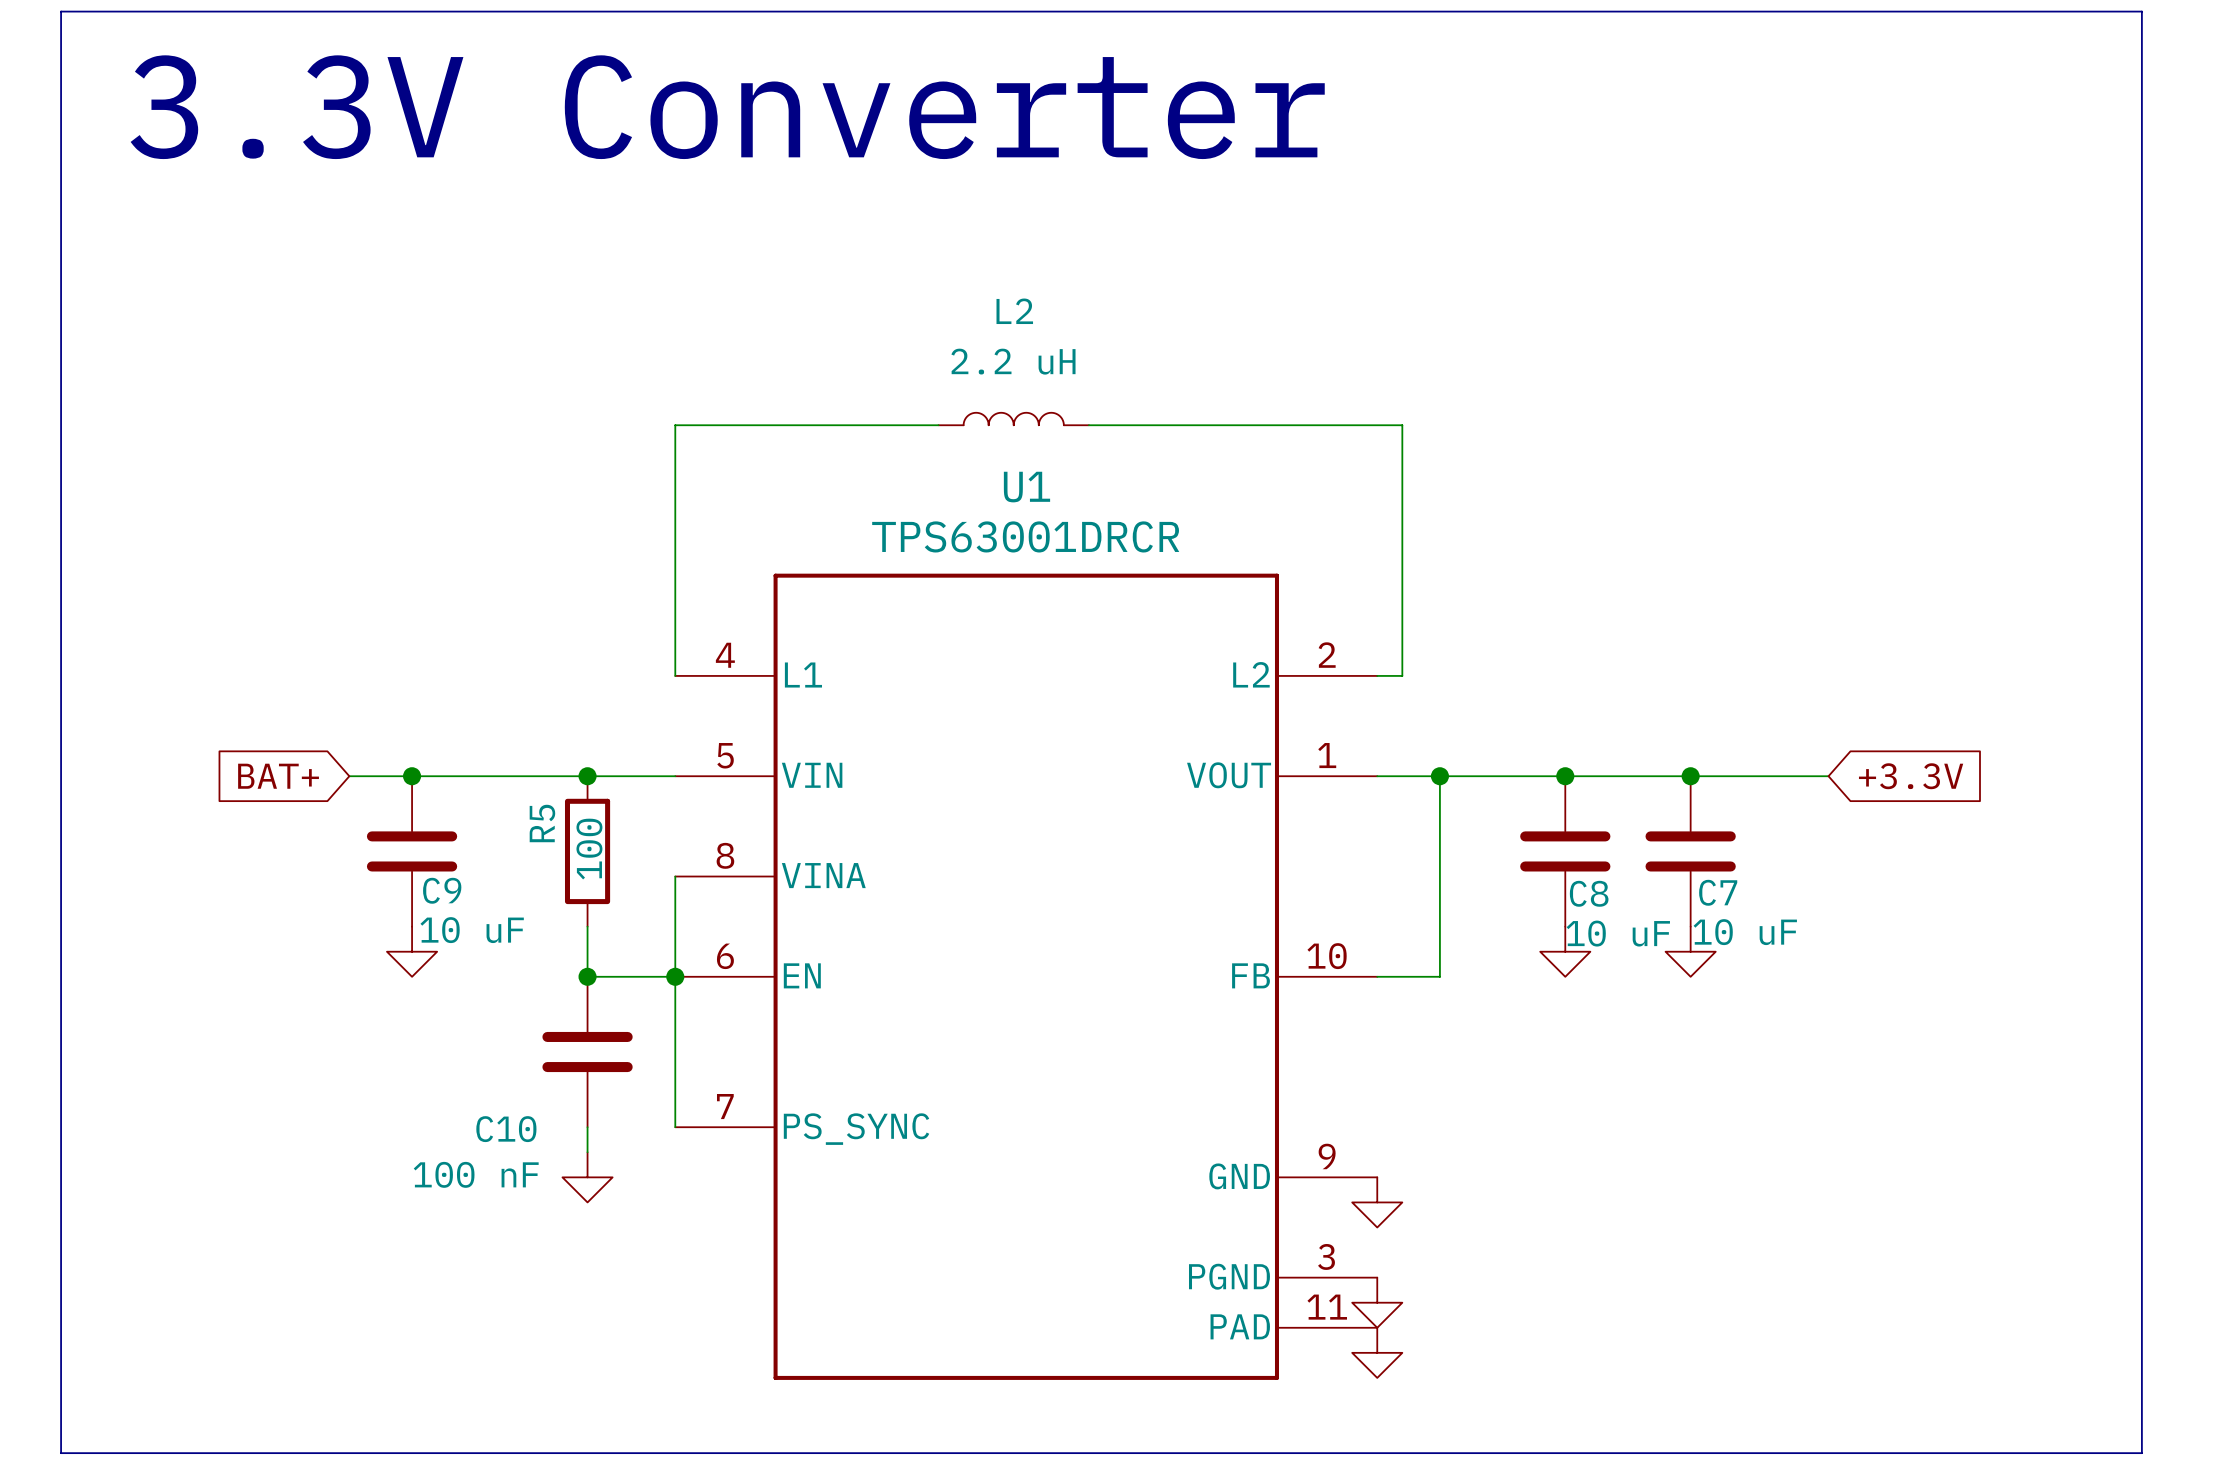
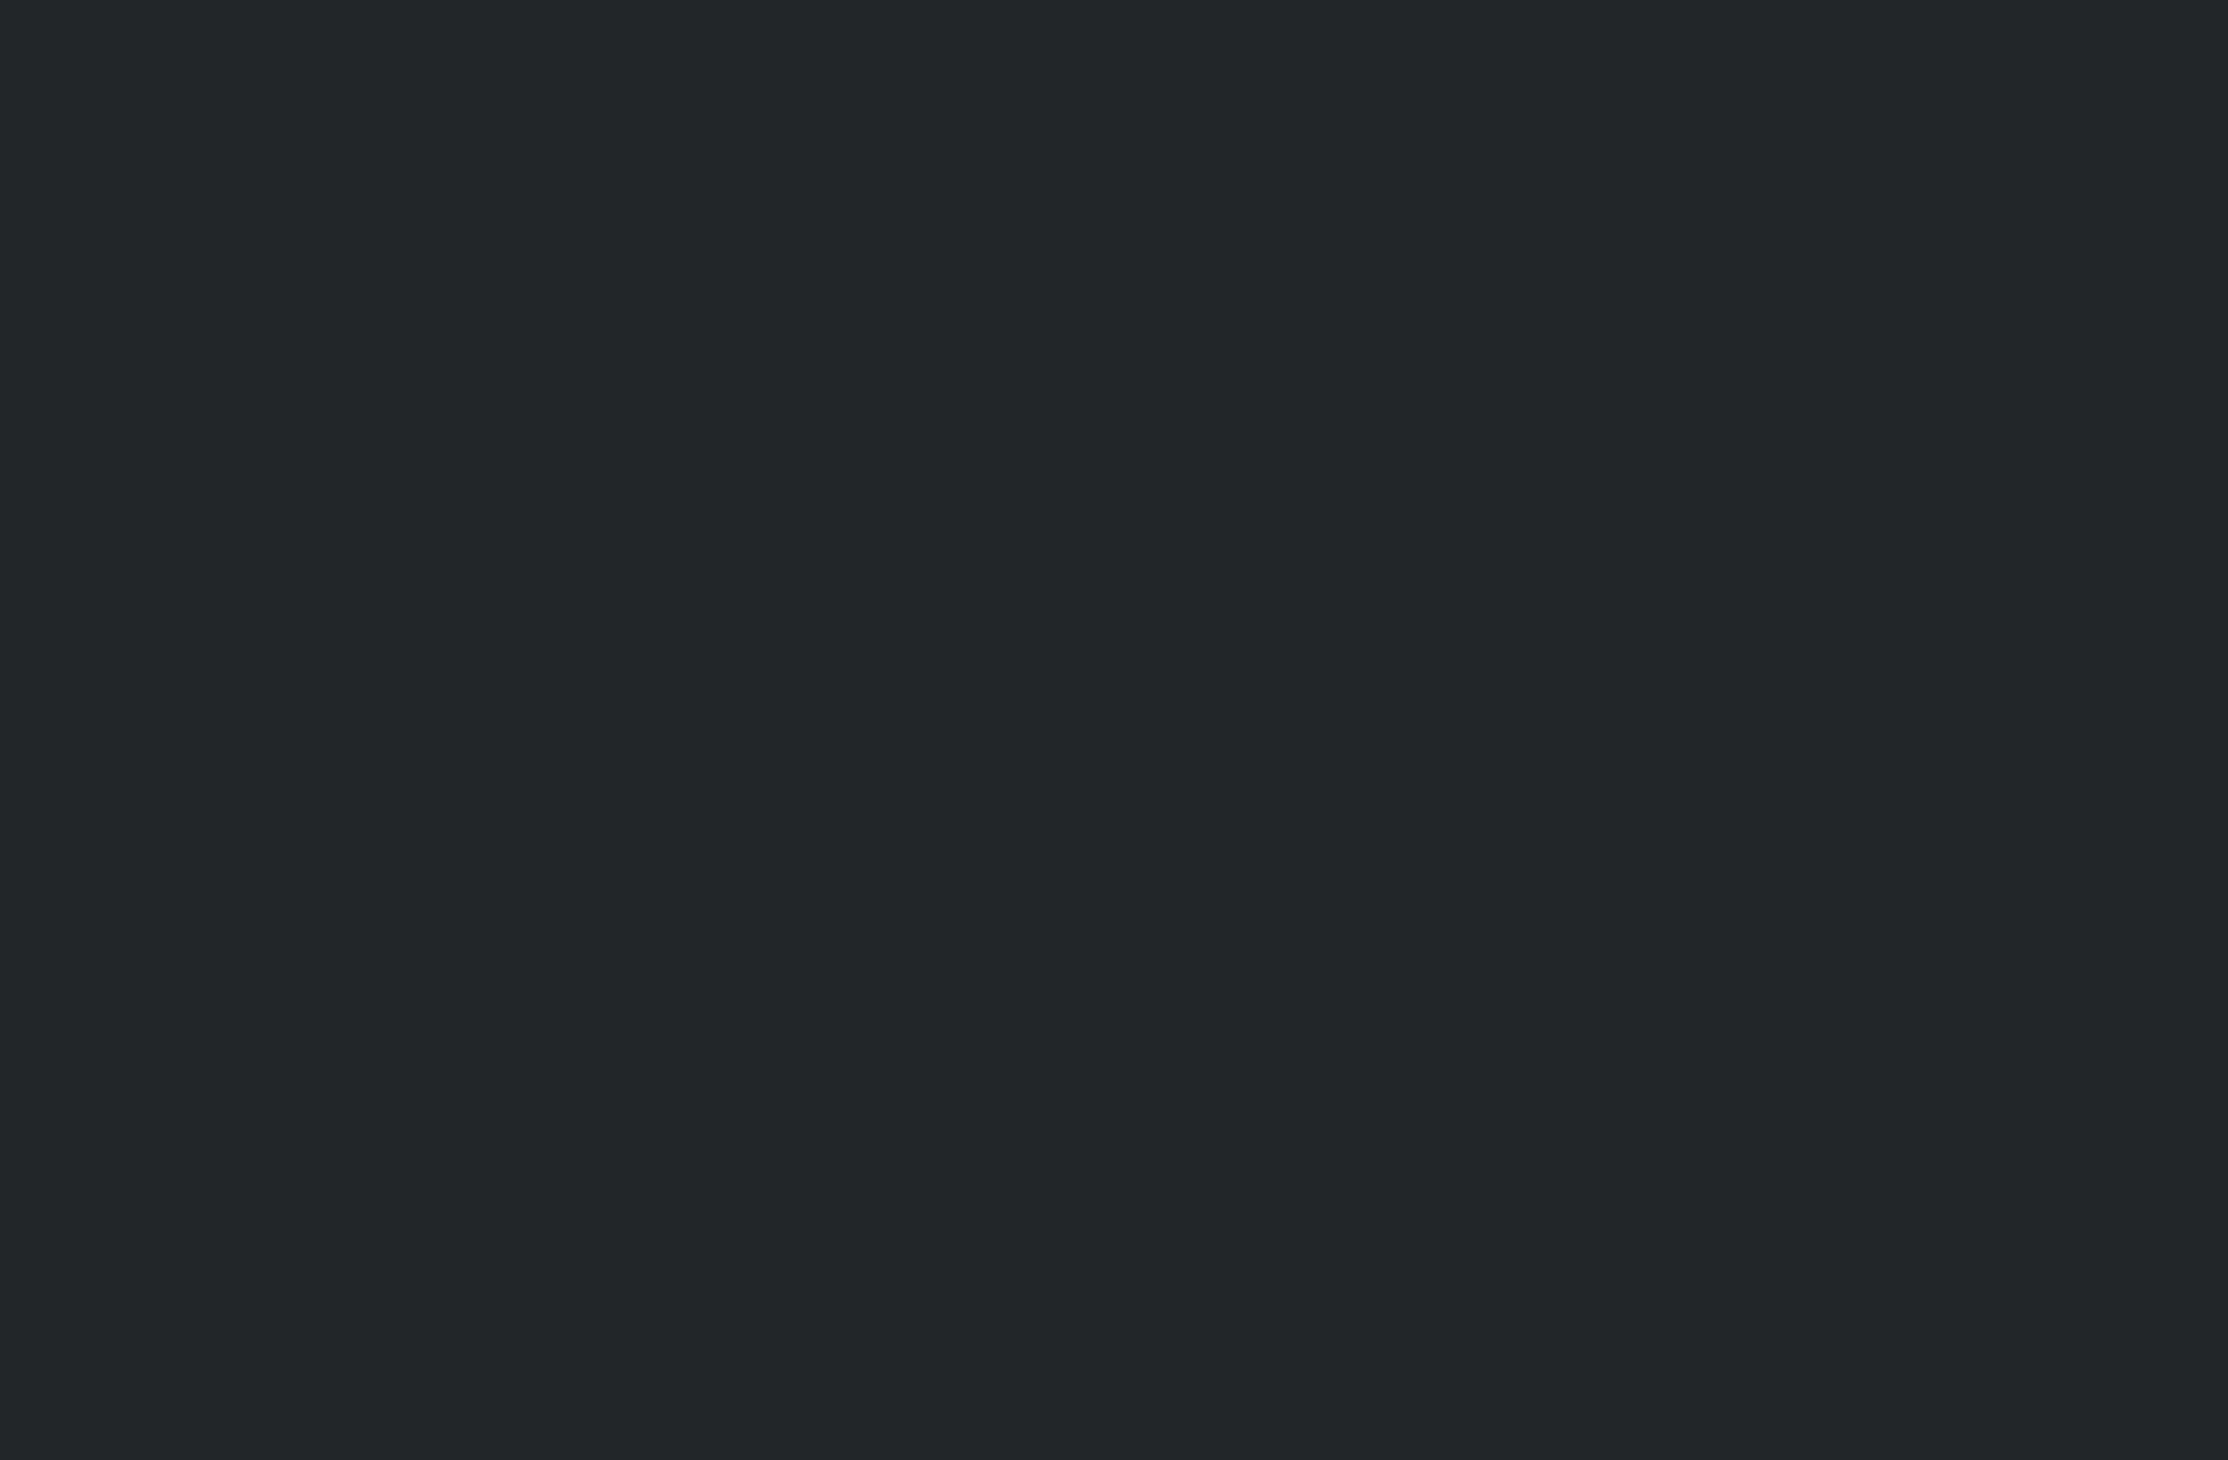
line: (61, 11) (2141, 11) (2141, 1453) (61, 1453) (61, 11) -> none
text: 3.3V Converter (727, 107) -> none
L2: 2.2 uH (1013, 419) -> none
wire: (938, 425) (675, 425) (675, 675) -> none
wire: (1088, 425) (1402, 425) (1402, 675) (1377, 675) -> none
global label: BAT+ (278, 776) -> none
wire: (349, 776) (675, 776) -> none
junction: (412, 776) -> none
junction: (587, 776) -> none
wire: (1377, 776) (1828, 776) -> none
wire: (1439, 776) (1439, 976) (1377, 976) -> none
junction: (1439, 776) -> none
junction: (1565, 776) -> none
junction: (1690, 776) -> none
global label: +3.3V (1911, 776) -> none
C9: 10 uF (412, 851) -> none
R5: 100 (587, 851) -> none
C8: 10 uF (1565, 851) -> none
C7: 10 uF (1690, 851) -> none
wire: (675, 876) (675, 1127) -> none
wire: (587, 926) (587, 976) (675, 976) -> none
power symbol: (412, 951) -> none
power symbol: (1565, 951) -> none
power symbol: (1690, 951) -> none
junction: (587, 976) -> none
junction: (675, 976) -> none
U1: TPS63001DRCR (1026, 976) -> none
C10: 100 nF (587, 1052) -> none
wire: (587, 1127) (587, 1152) -> none
power symbol: (587, 1177) -> none
power symbol: (1377, 1202) -> none
power symbol: (1377, 1302) -> none
power symbol: (1377, 1352) -> none

